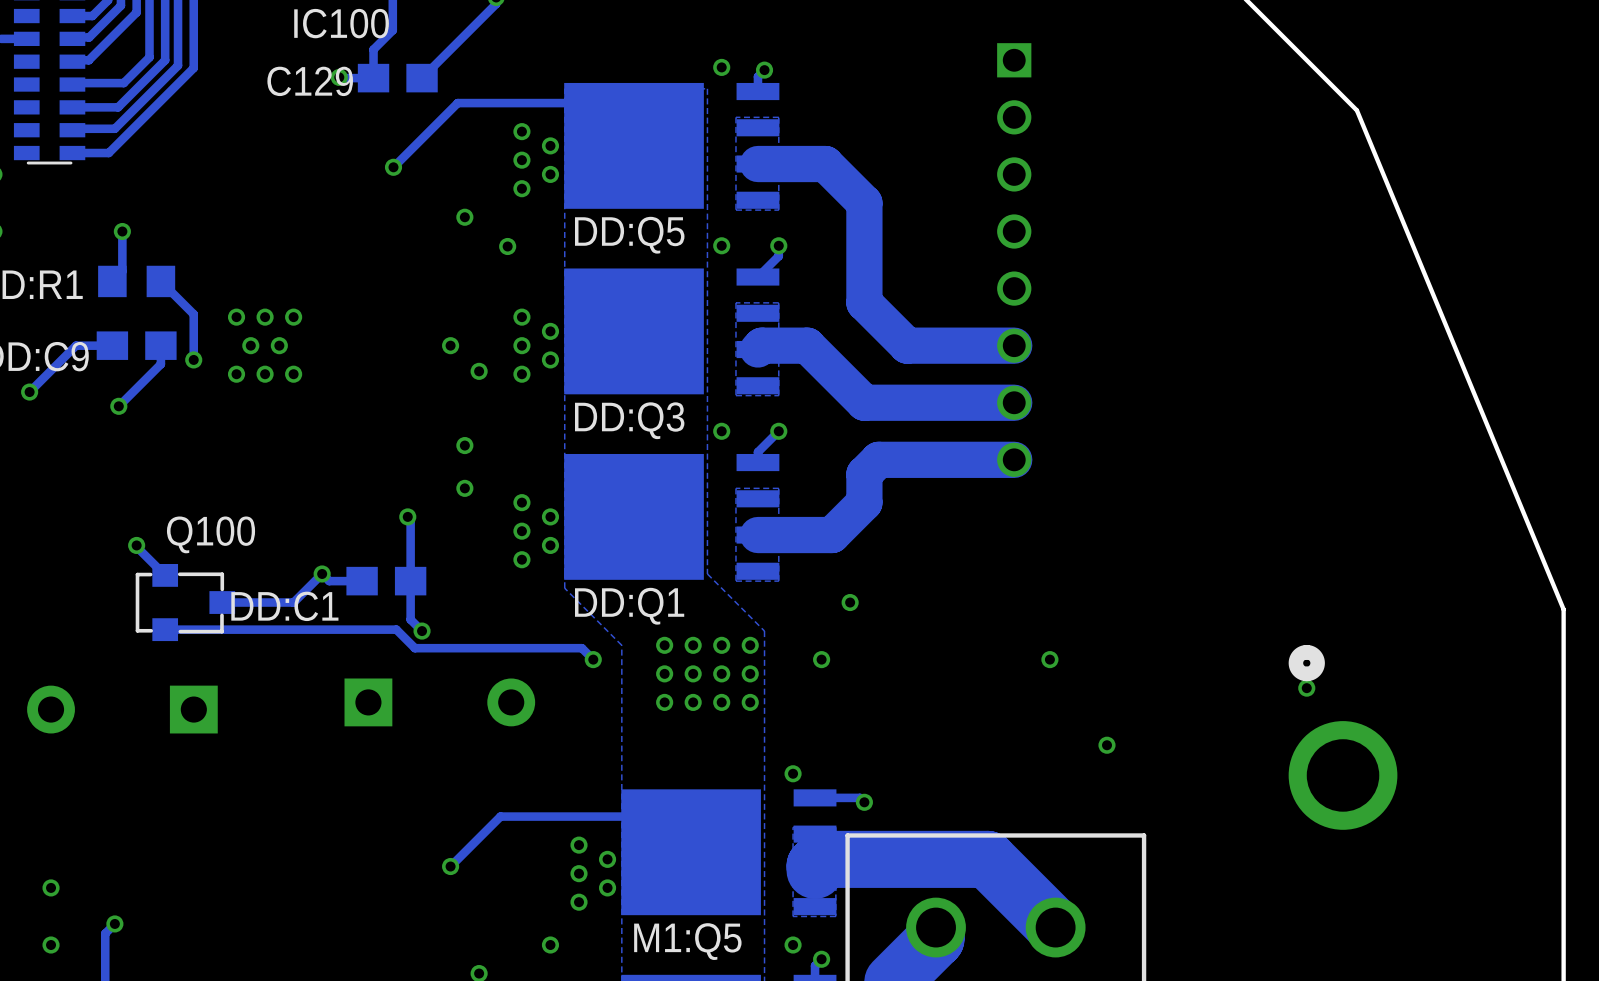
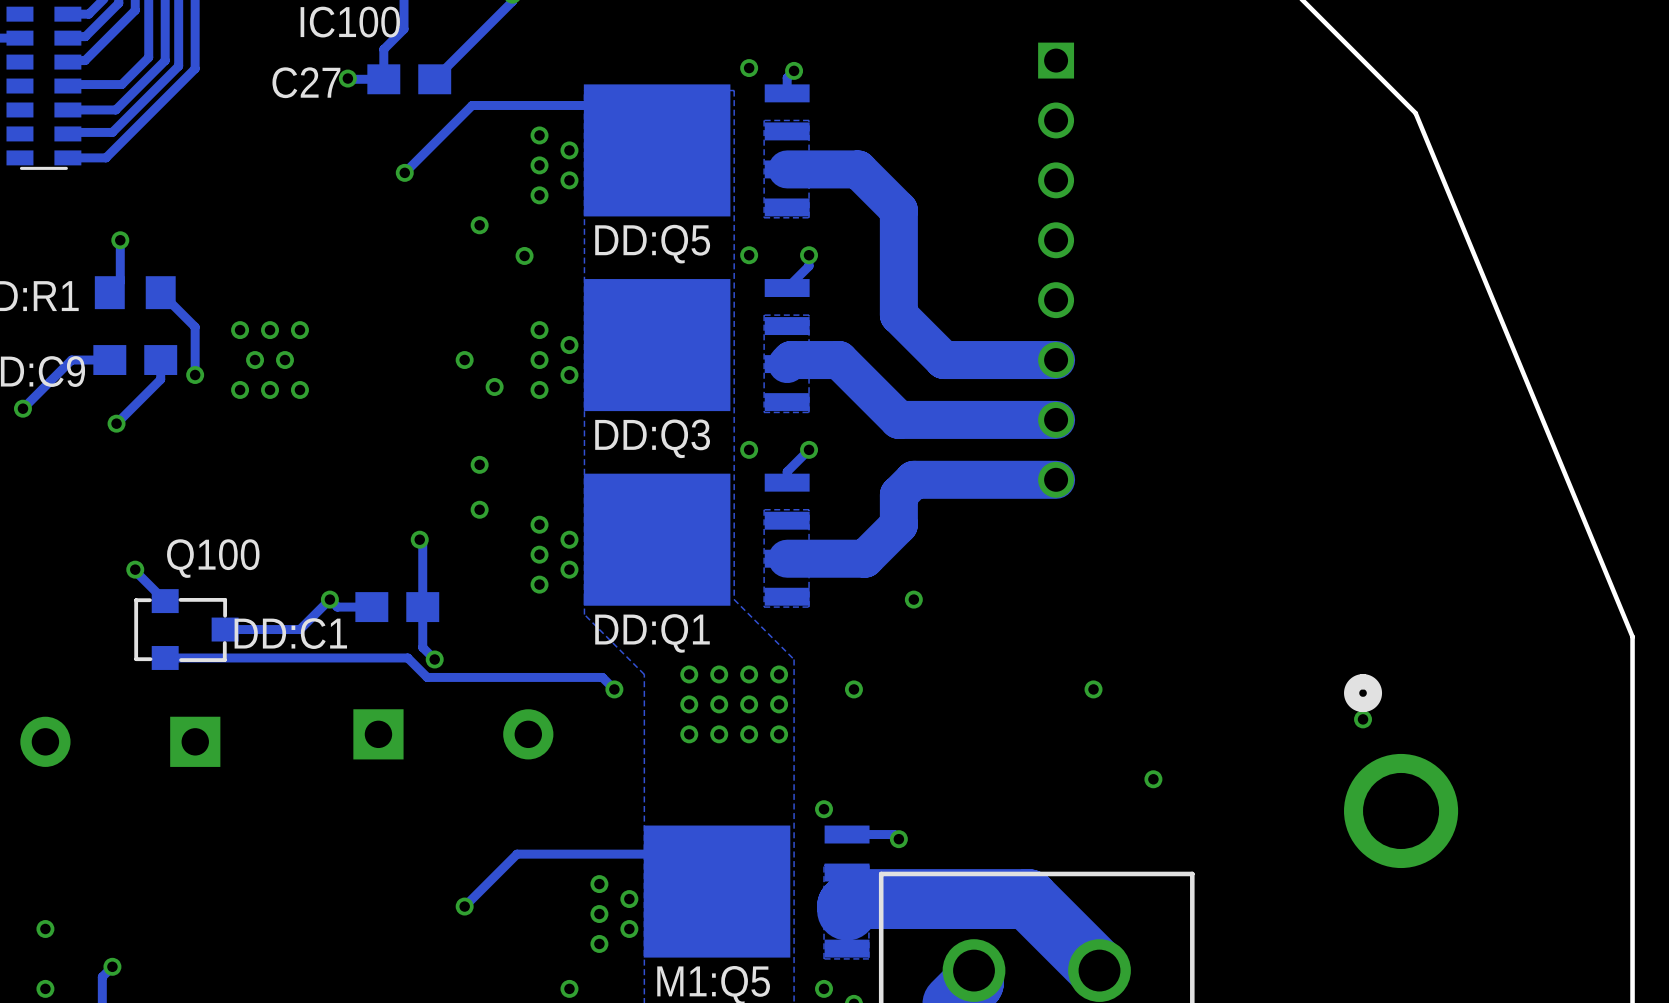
C129 name: C129 (310, 81) -> C27 (306, 82)
via position: (850, 602) -> (913, 599)

